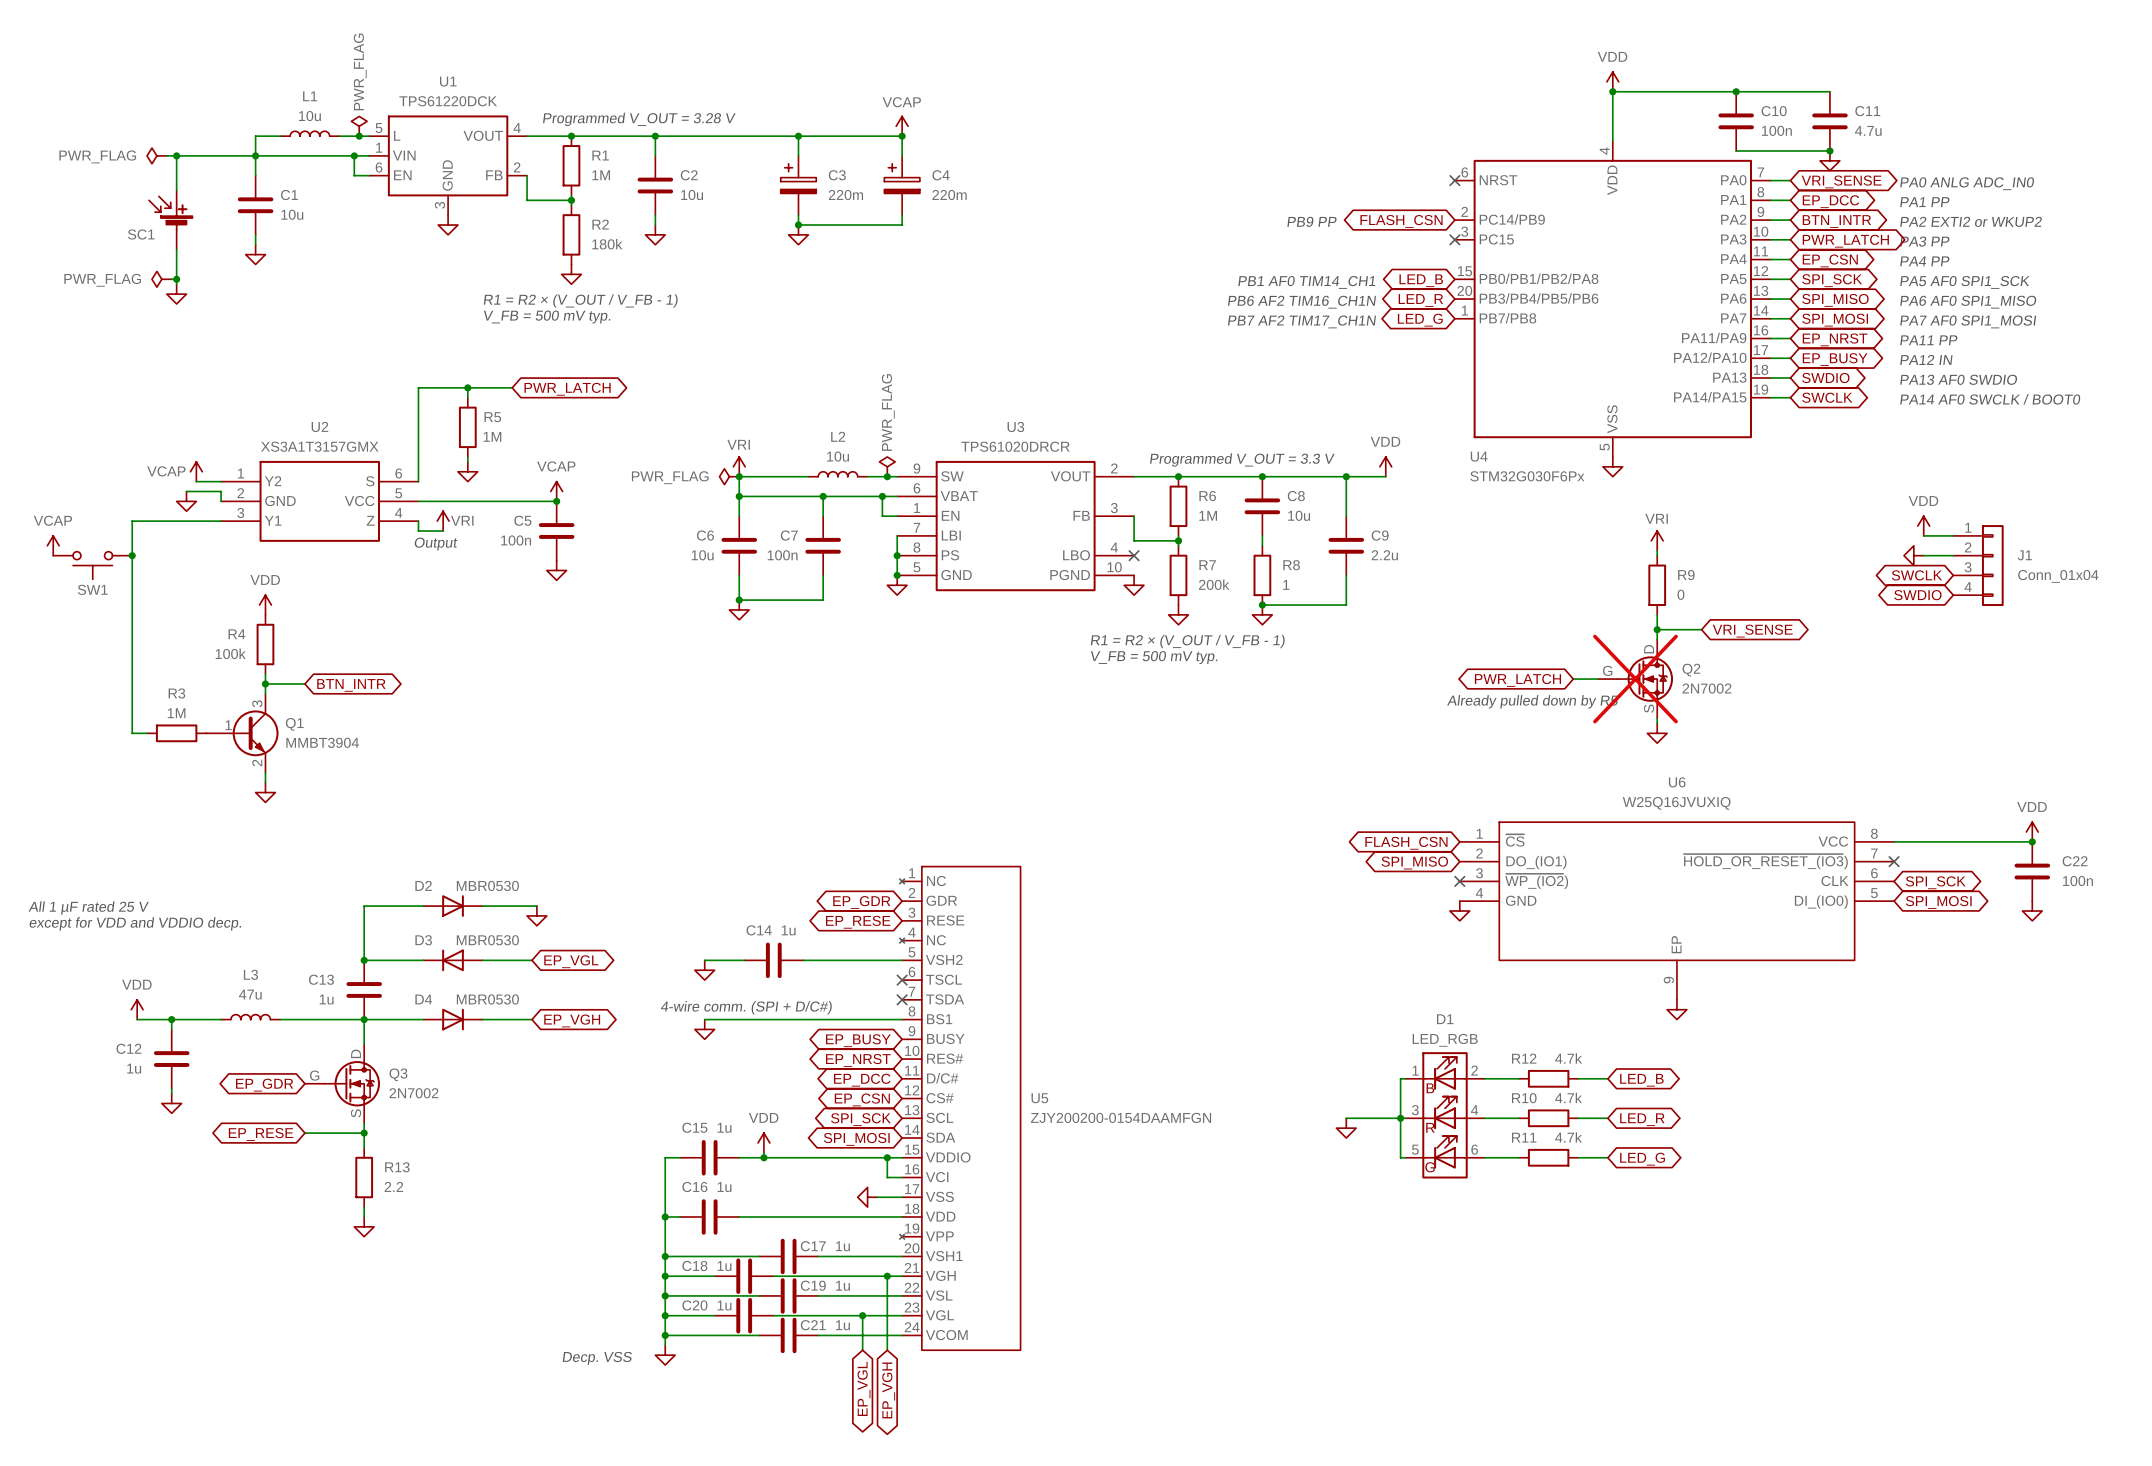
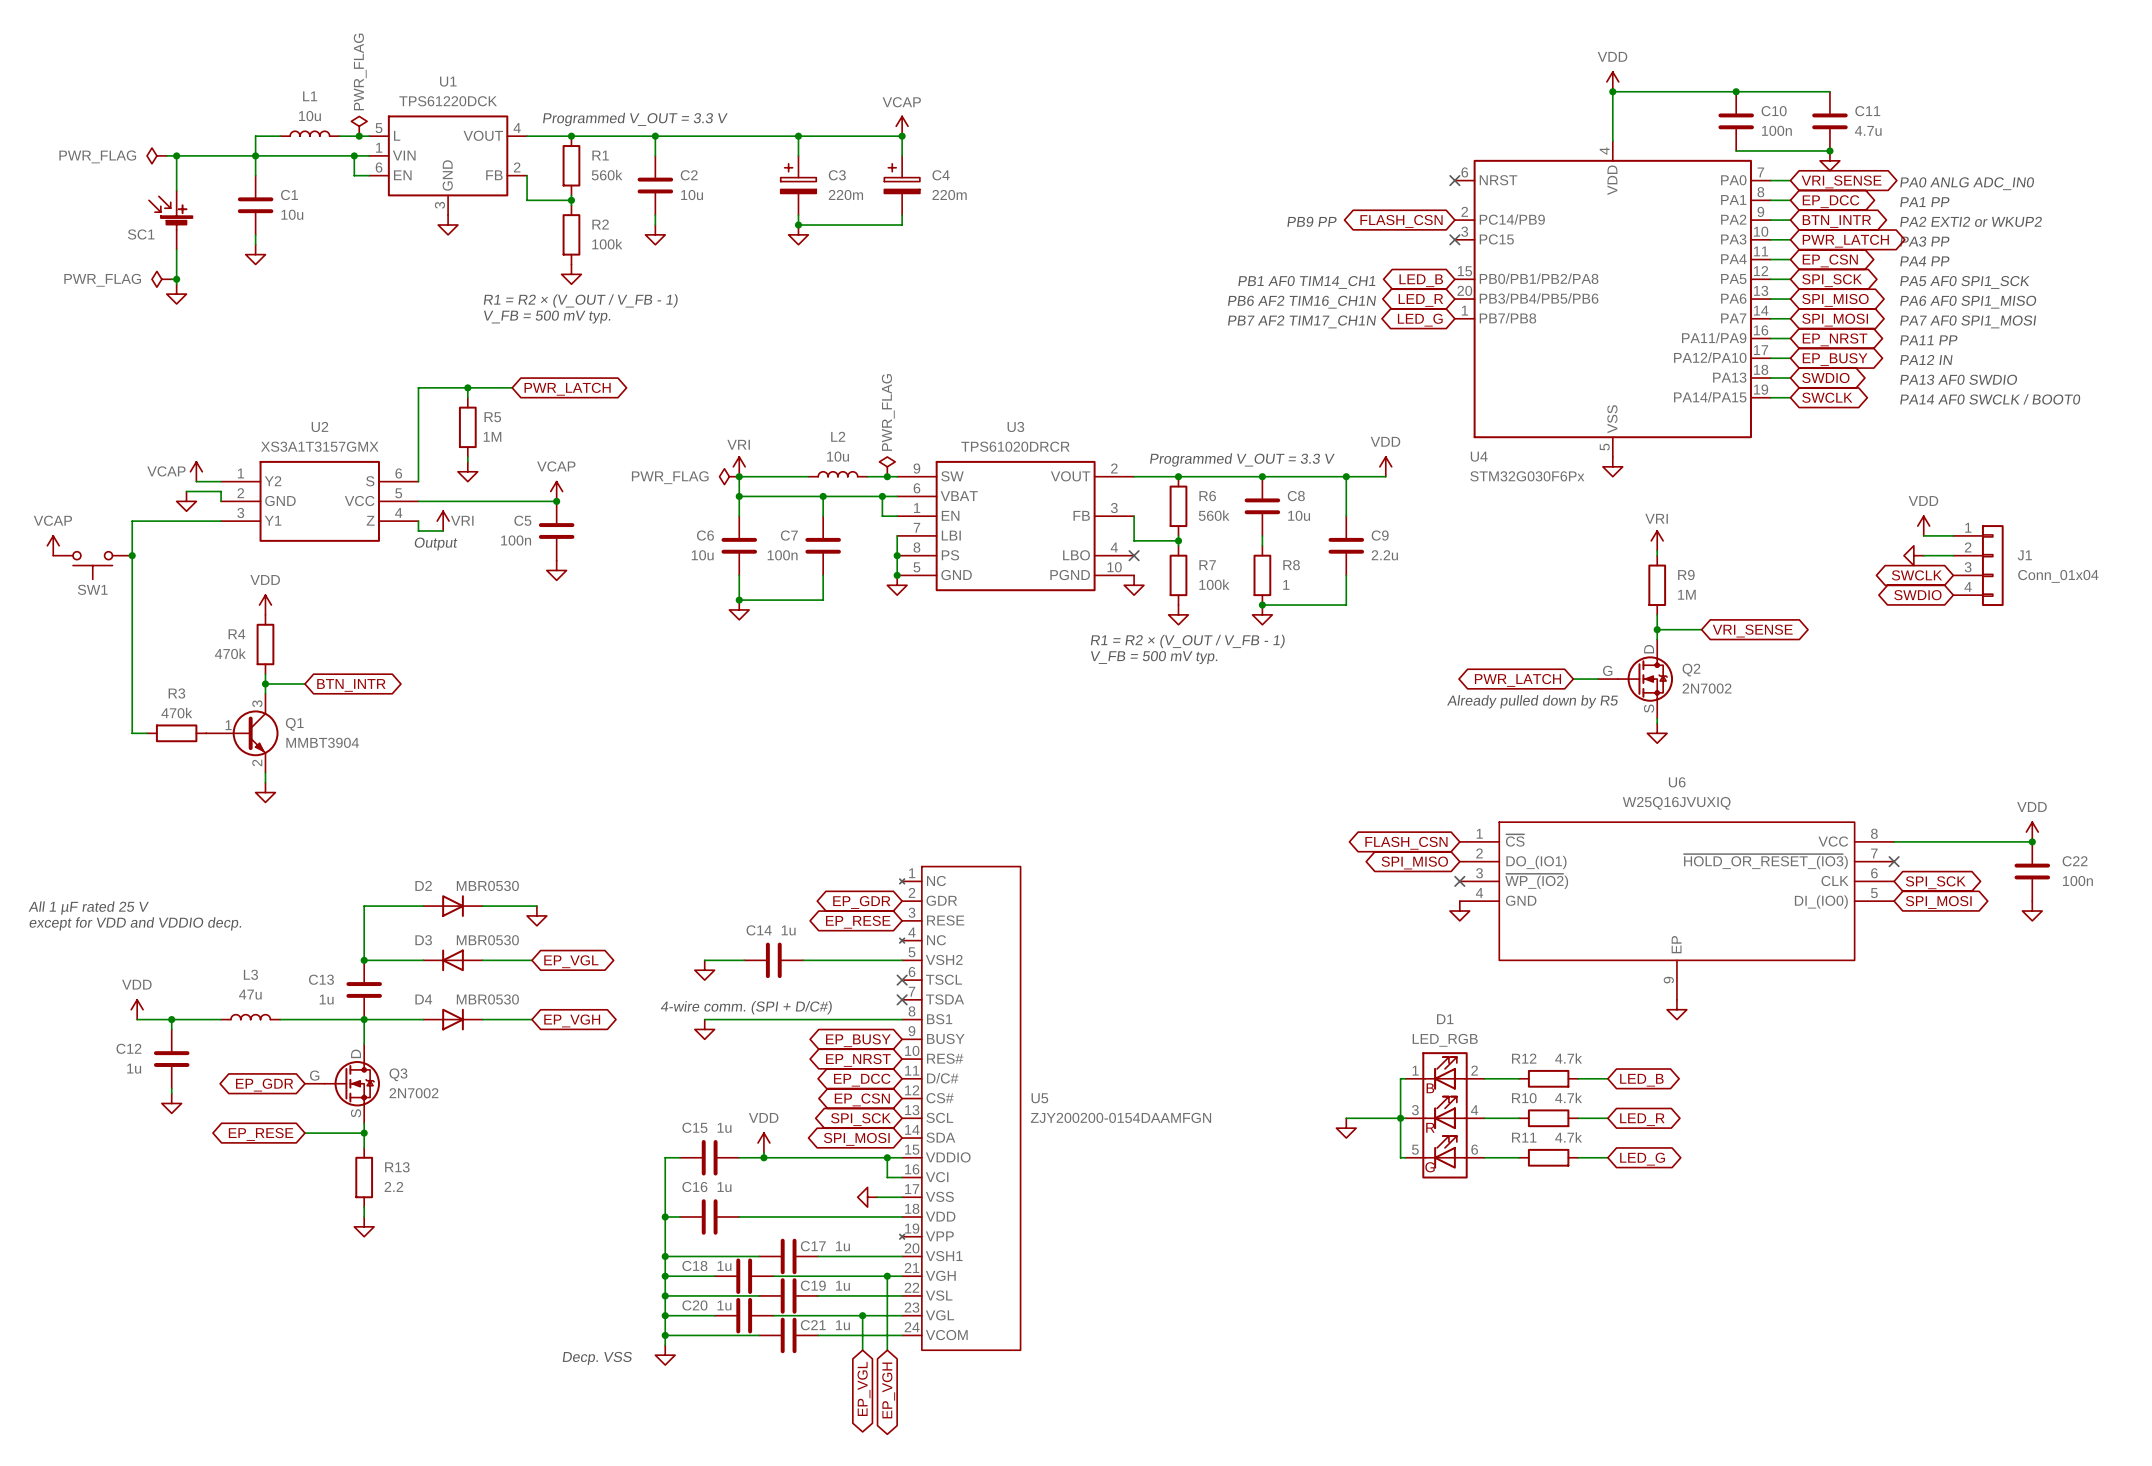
text: Programmed V_OUT = 3.28 V (639, 119) -> Programmed V_OUT = 3.3 V (635, 119)
R1 value: 1M (601, 175) -> 560k (607, 175)
R2 value: 180k (607, 244) -> 100k (607, 244)
R6 value: 1M (1208, 515) -> 560k (1214, 515)
R7 value: 200k (1214, 584) -> 100k (1214, 584)
R9 value: 0 (1680, 594) -> 1M (1686, 594)
R4 value: 100k (230, 653) -> 470k (230, 653)
Q2 do-not-place cross: (1635, 679) -> none
R3 value: 1M (176, 713) -> 470k (176, 713)

